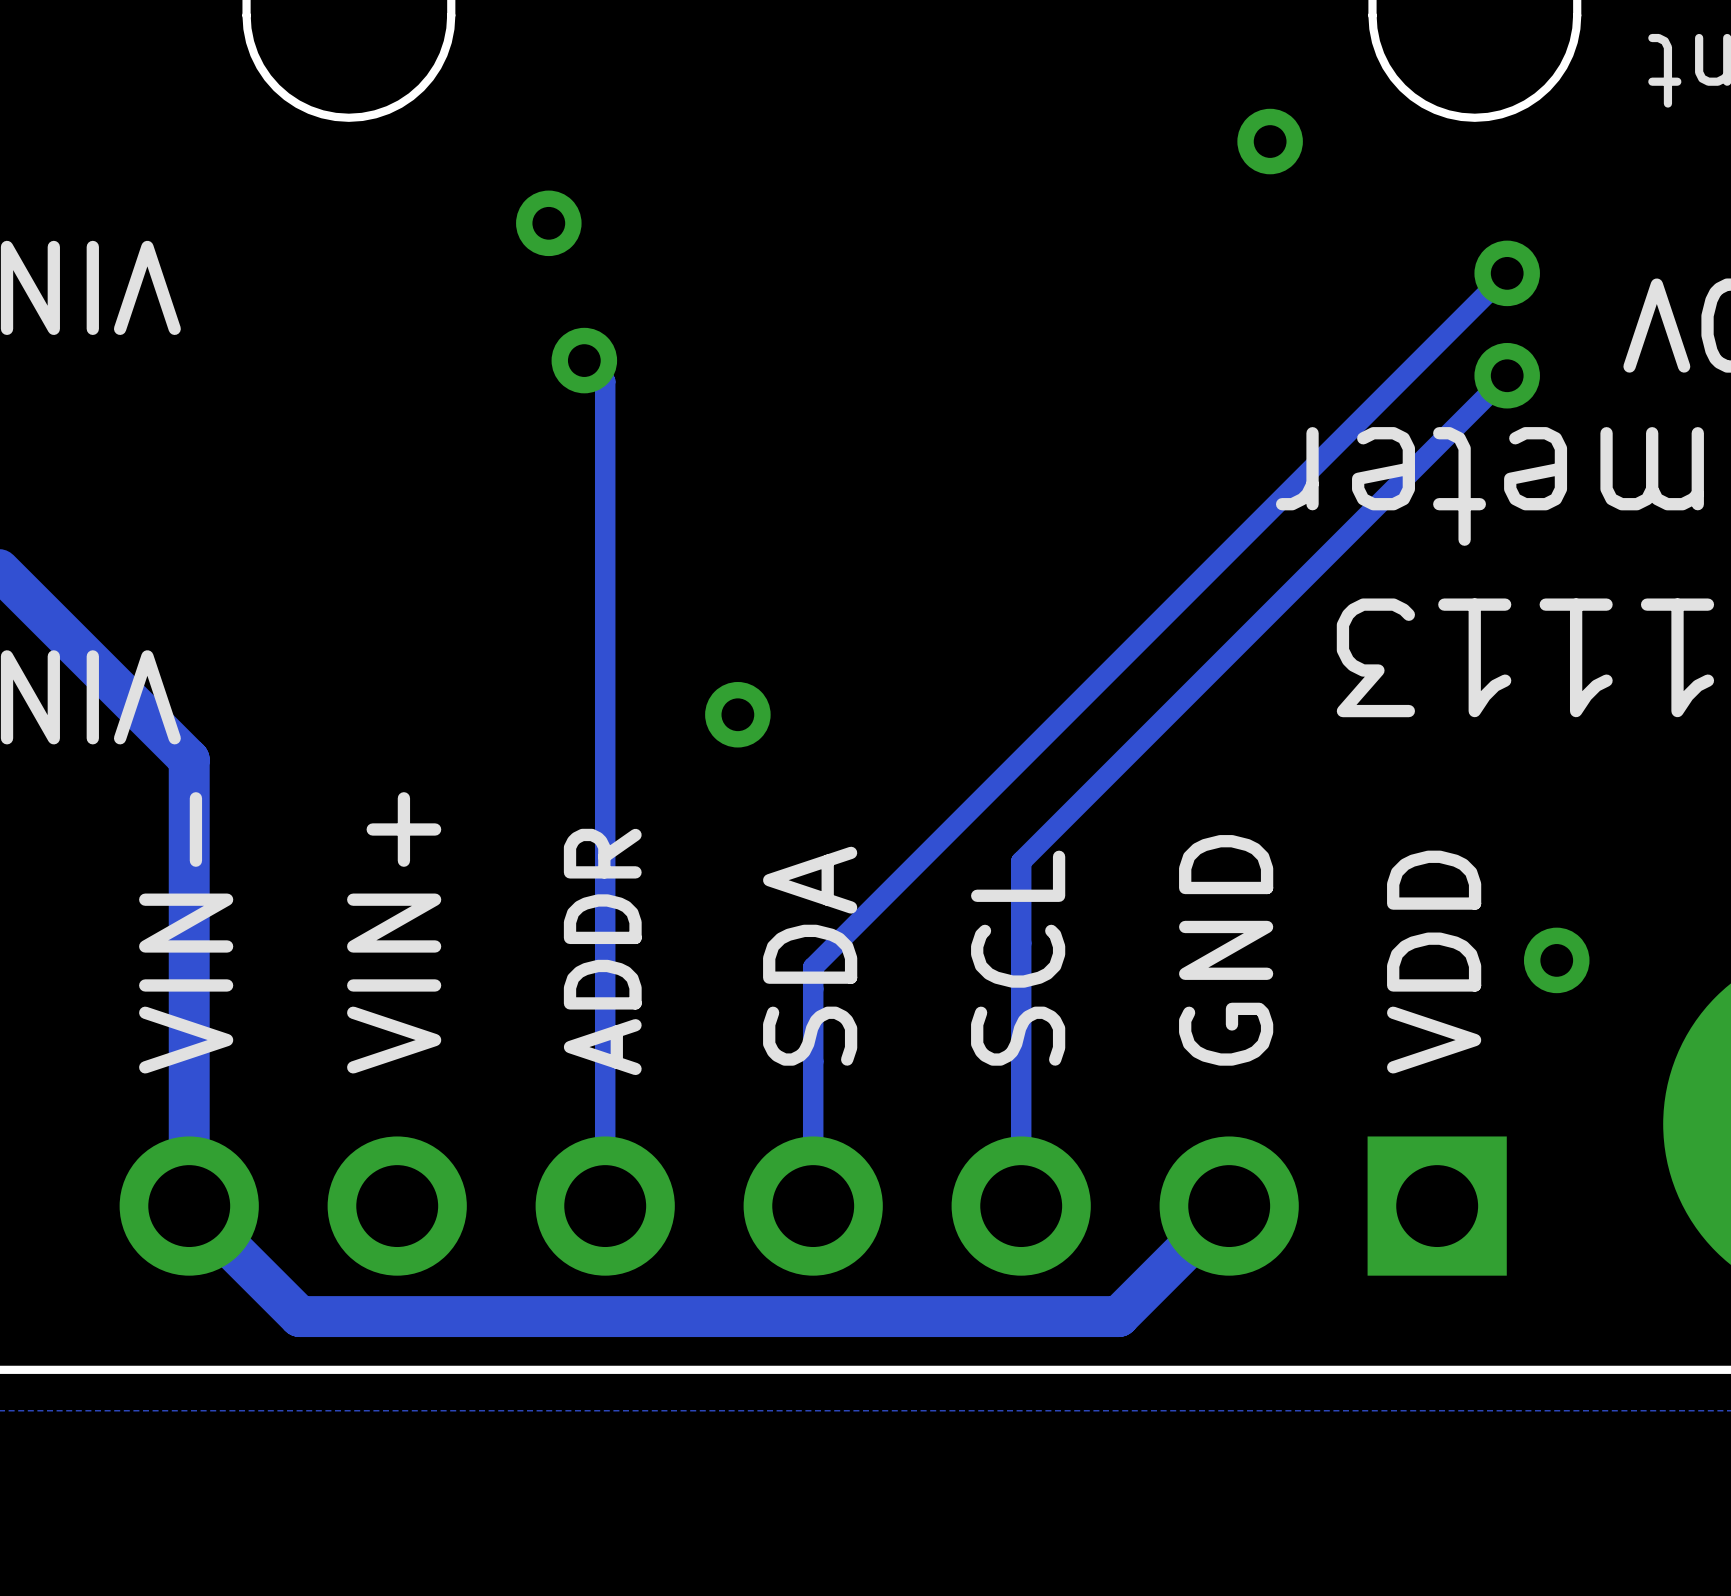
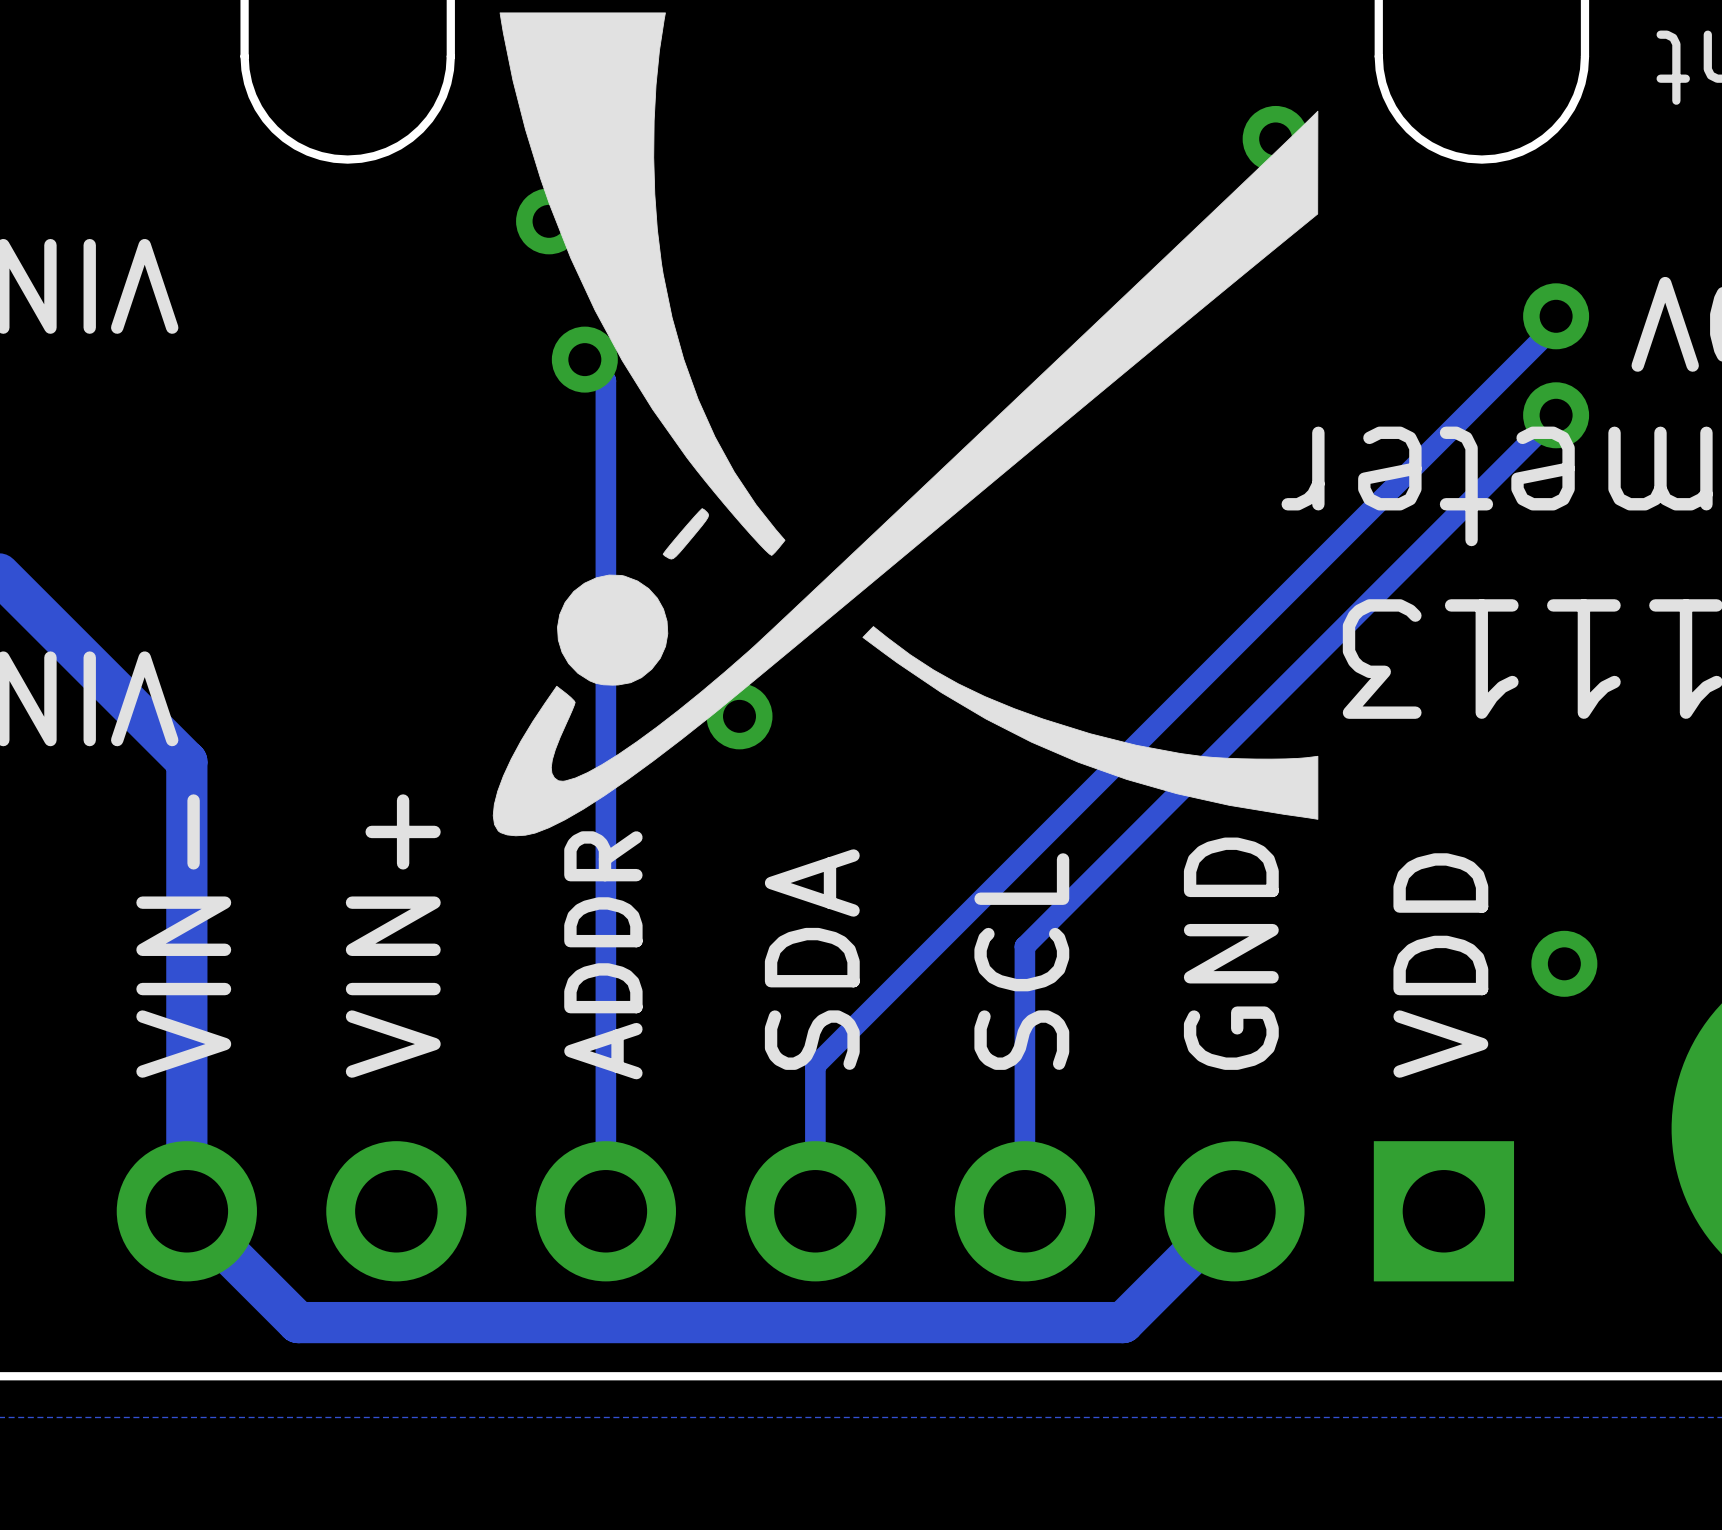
board edge: (451, 15) (450, 28) (443, 54) (430, 77) (421, 87) (400, 104) (388, 110) (362, 116) (348, 117) (335, 116) (309, 110) (297, 104) (276, 87) (267, 77) (254, 54) (247, 28) (246, 15) -> (450, 11) (449, 69) (442, 95) (429, 119) (420, 129) (399, 145) (374, 156) (347, 159) (321, 156) (296, 145) (274, 129) (265, 119) (252, 95) (245, 69) (244, 11)
drawing: none -> [492, 12, 1319, 837]
board edge: (1577, 15) (1576, 28) (1569, 54) (1556, 77) (1547, 87) (1526, 104) (1514, 110) (1488, 116) (1474, 117) (1461, 116) (1435, 110) (1423, 104) (1402, 87) (1393, 77) (1380, 54) (1373, 28) (1372, 15) -> (1584, 11) (1584, 69) (1577, 95) (1563, 119) (1554, 129) (1533, 145) (1508, 156) (1481, 159) (1455, 156) (1430, 145) (1408, 129) (1400, 119) (1386, 95) (1379, 69) (1378, 11)
track: (1507, 273) (813, 967) (813, 1061) -> (1556, 316) (1556, 324) (815, 1065)
via: (1507, 273) -> none
via: none -> (1556, 316)
track: (1507, 375) (1021, 861) (1021, 943) -> (1556, 415) (1024, 946)
via: (1507, 375) -> none
via: none -> (1556, 415)

